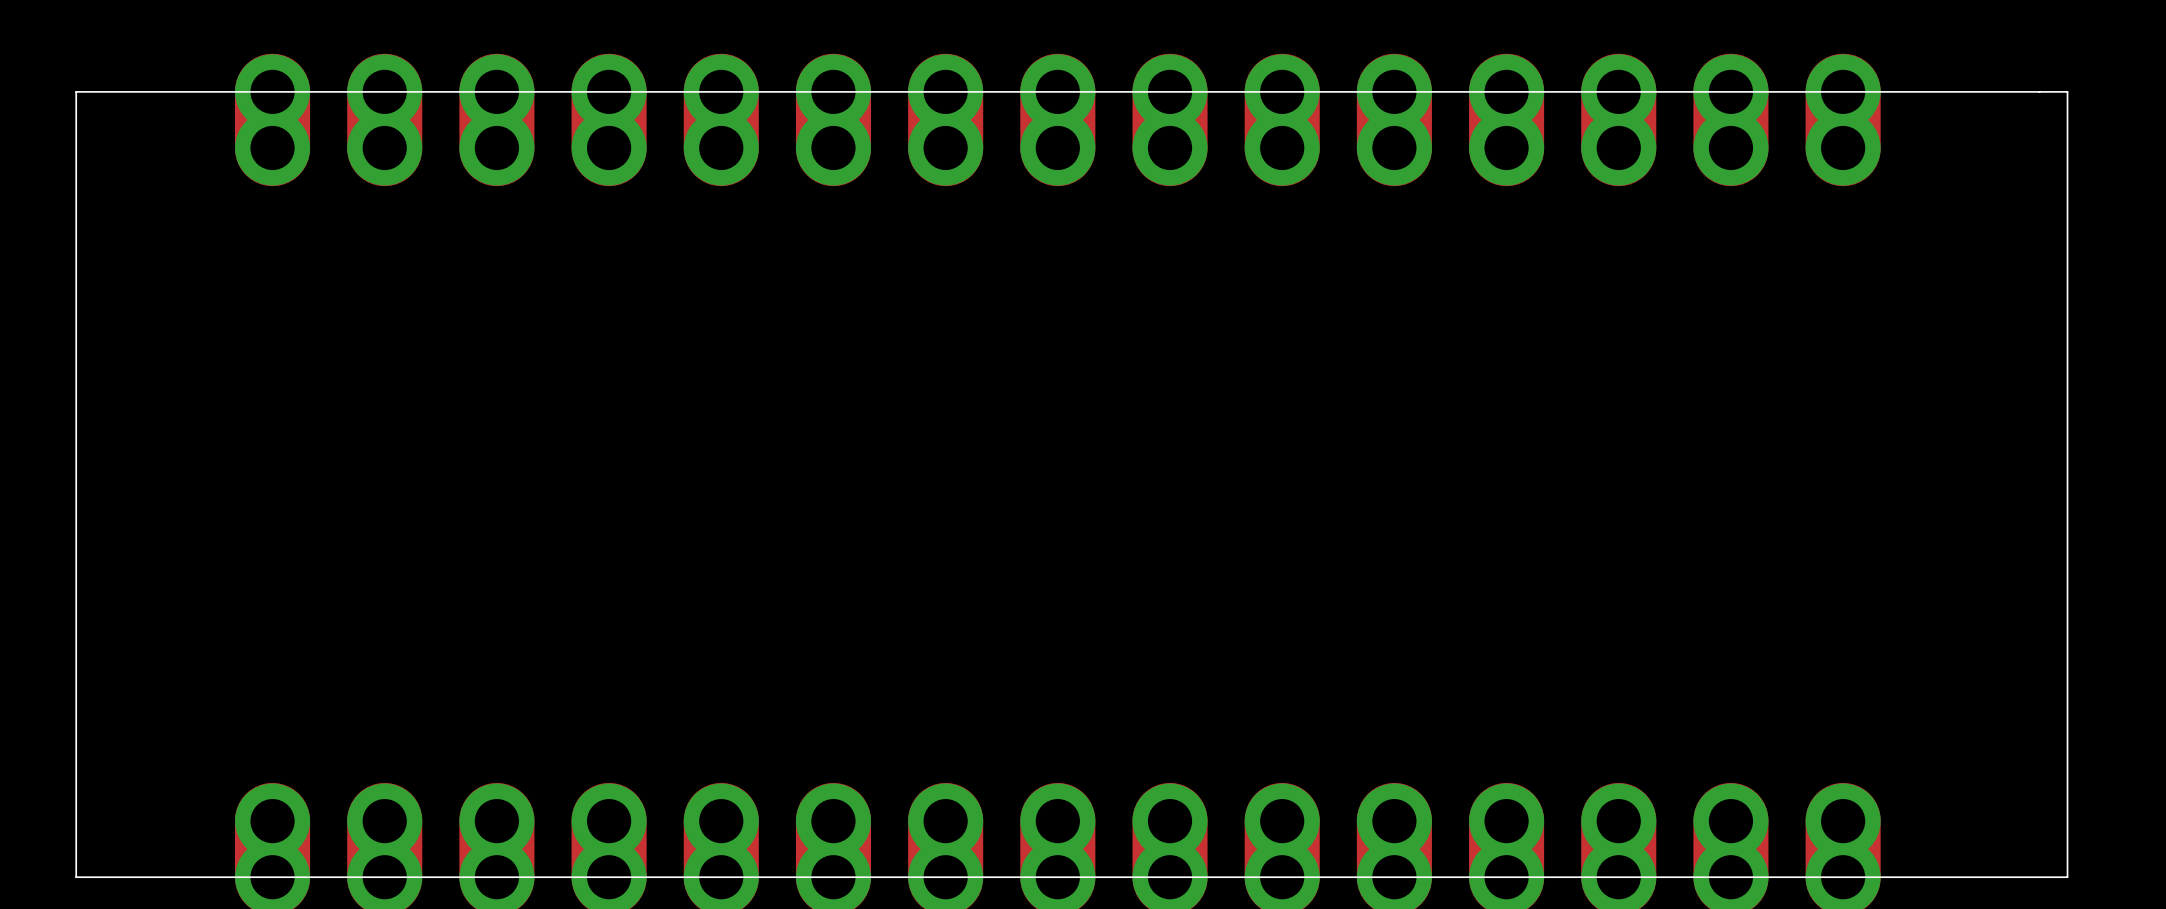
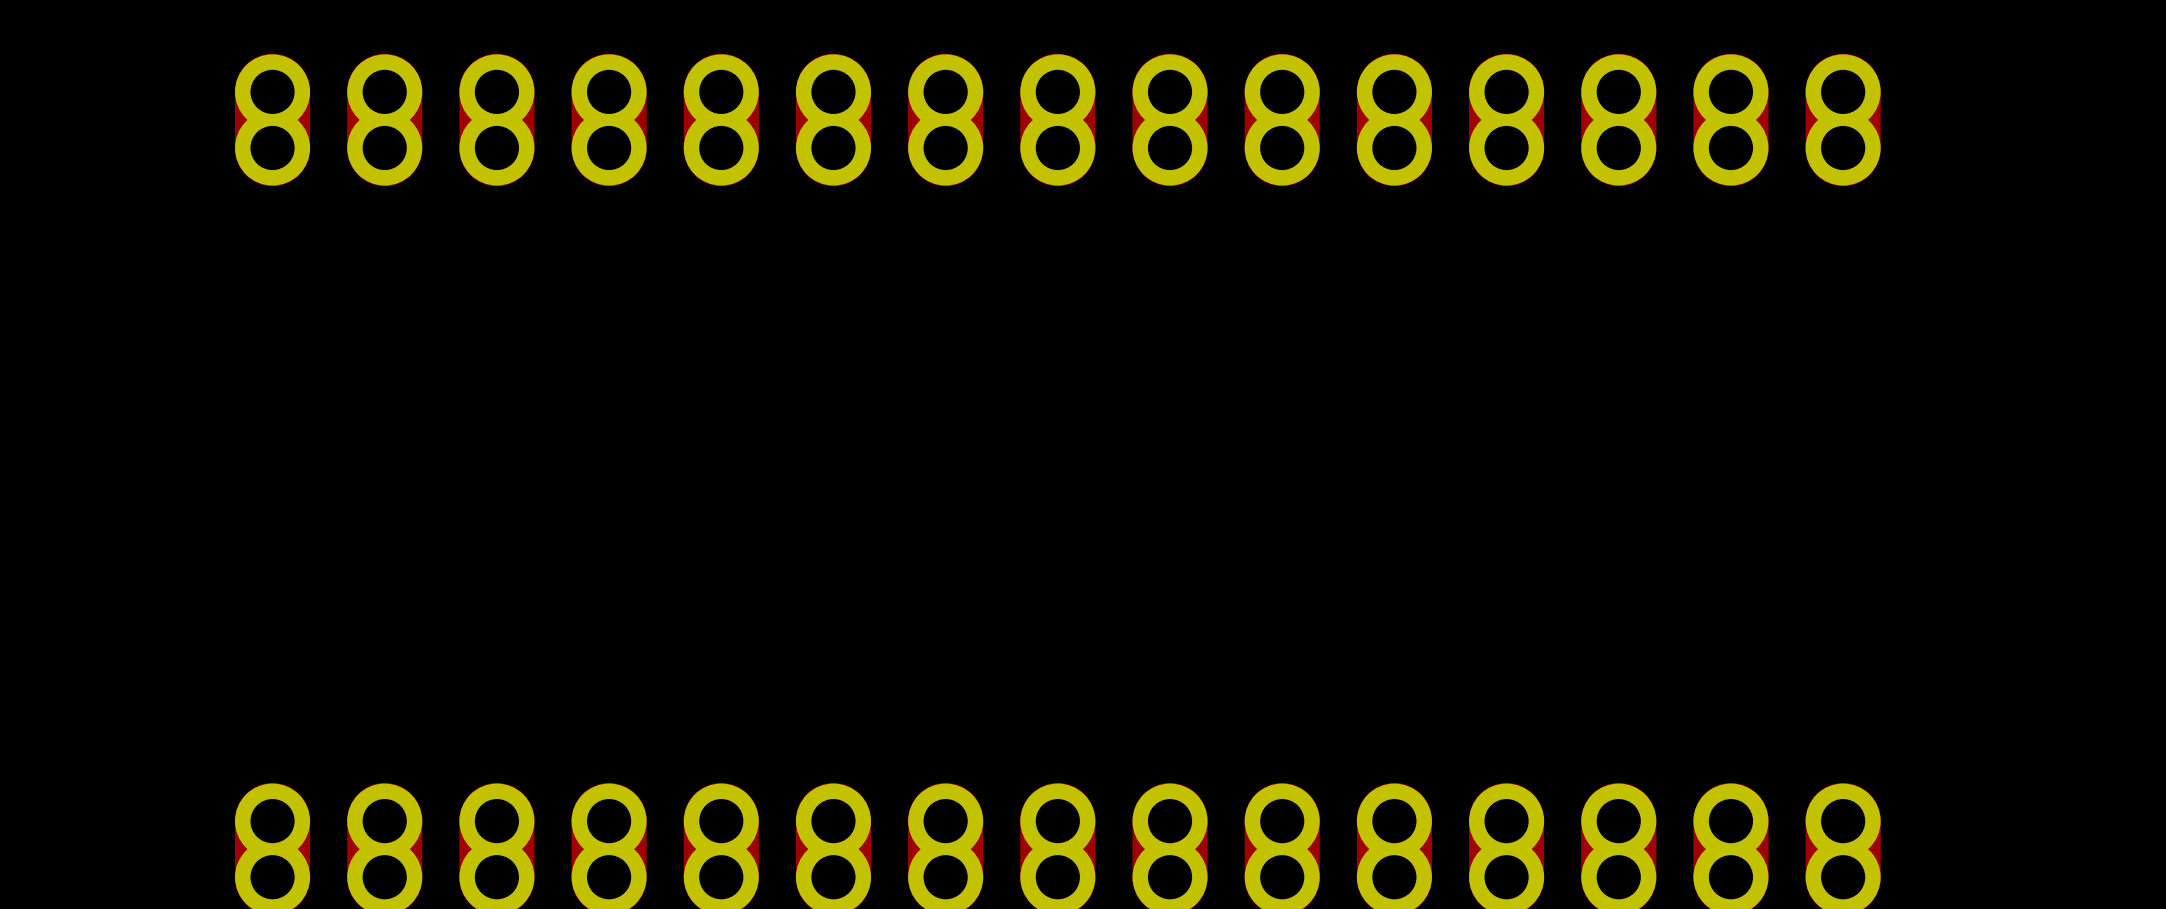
board edge: (76, 91) (2067, 91) (2067, 877) (76, 877) (76, 91) -> none

